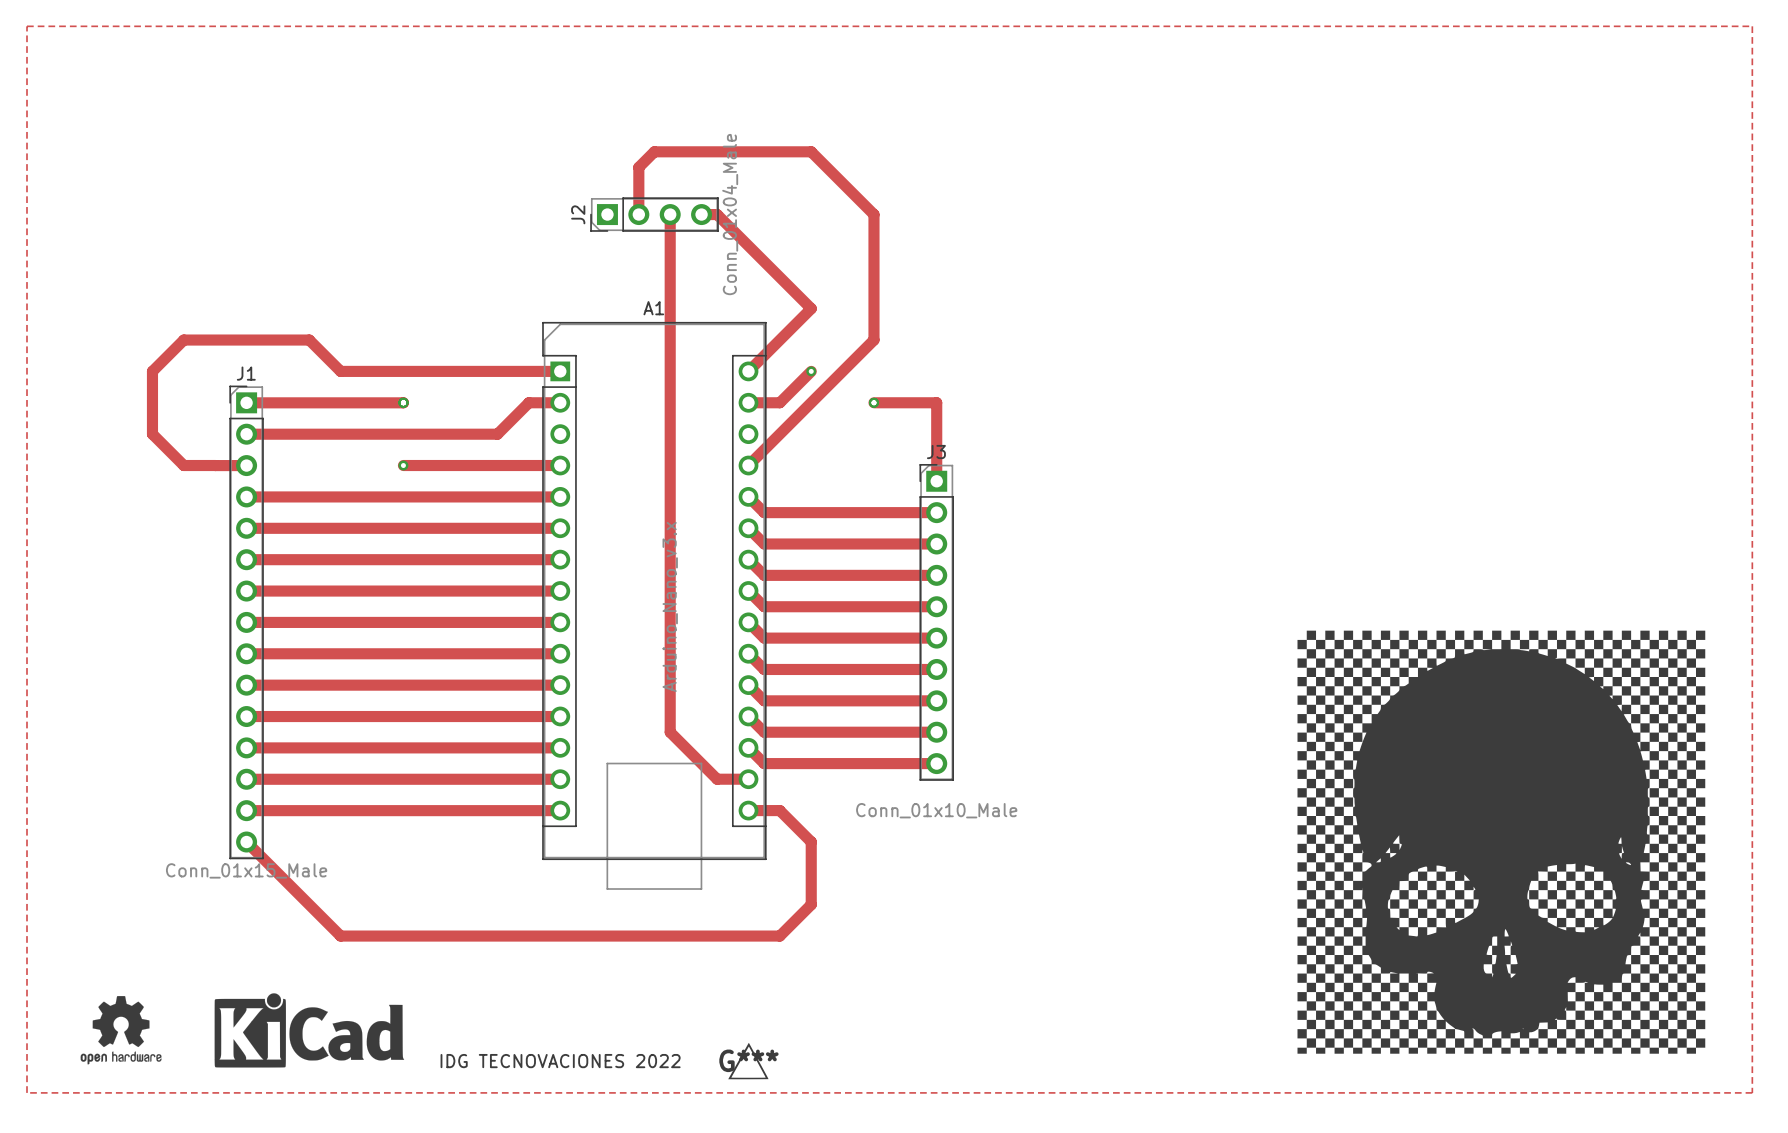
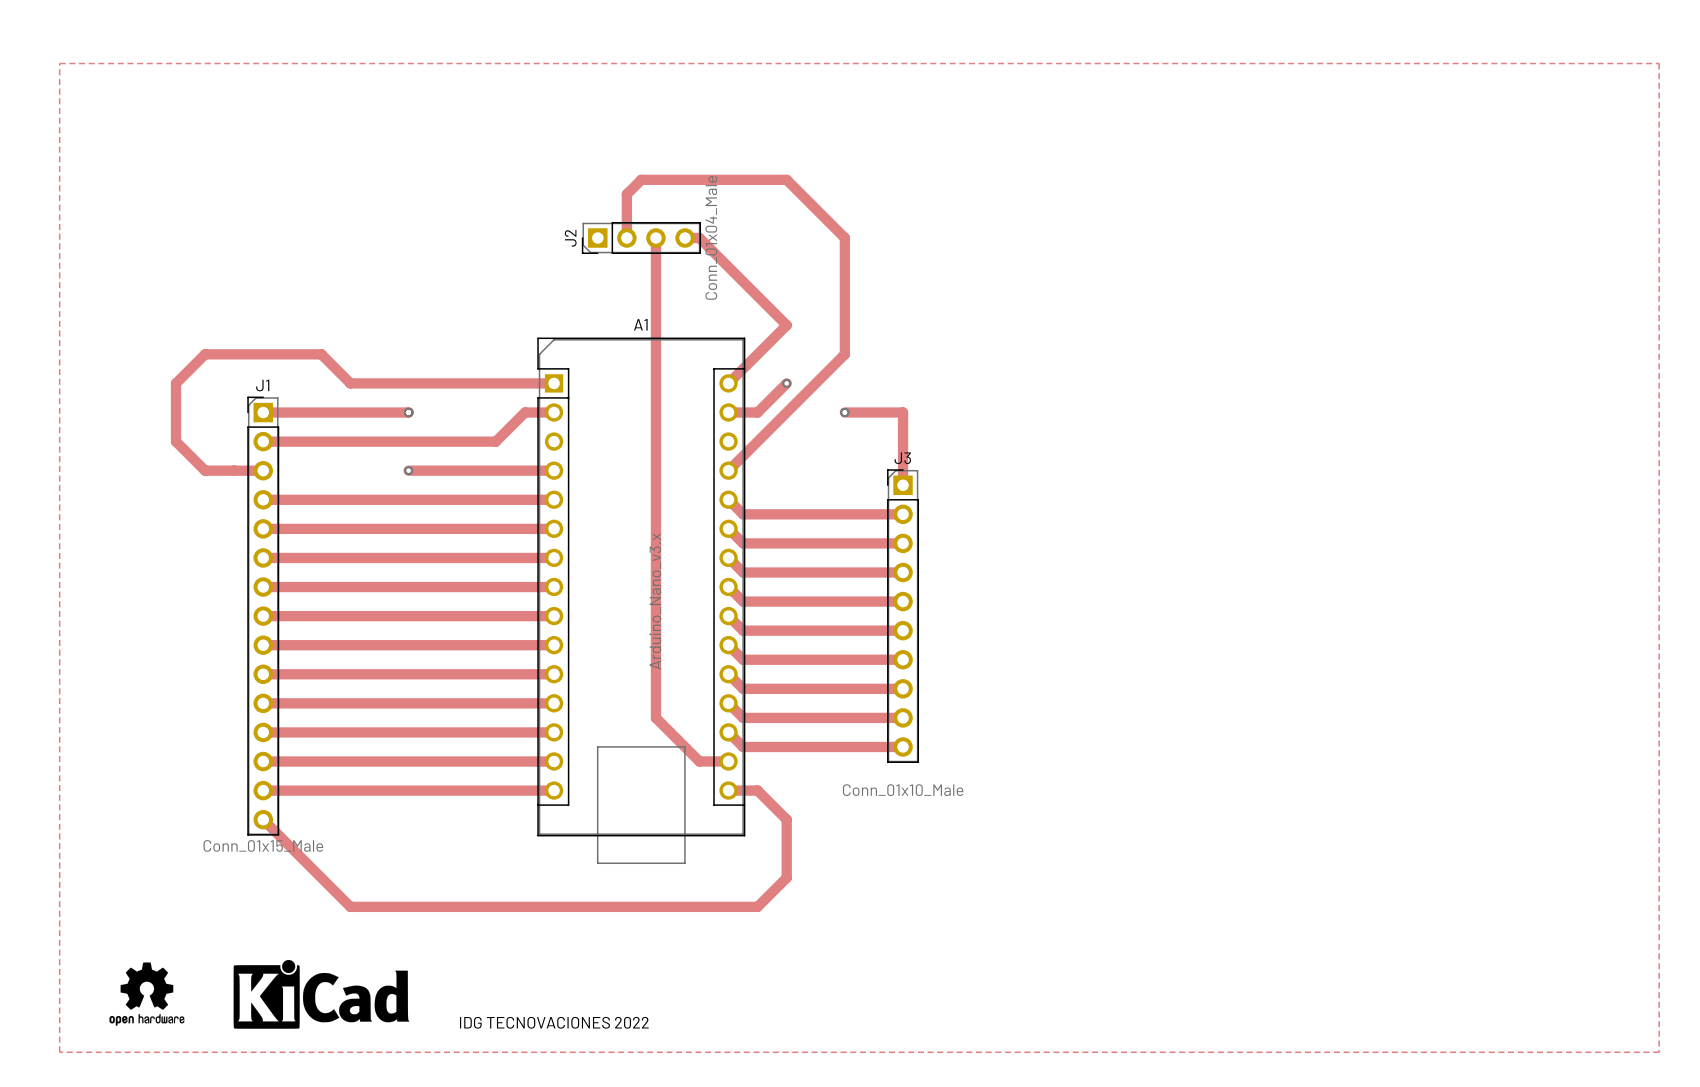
part: (1501, 842) -> none
G***: (748, 1061) -> none

